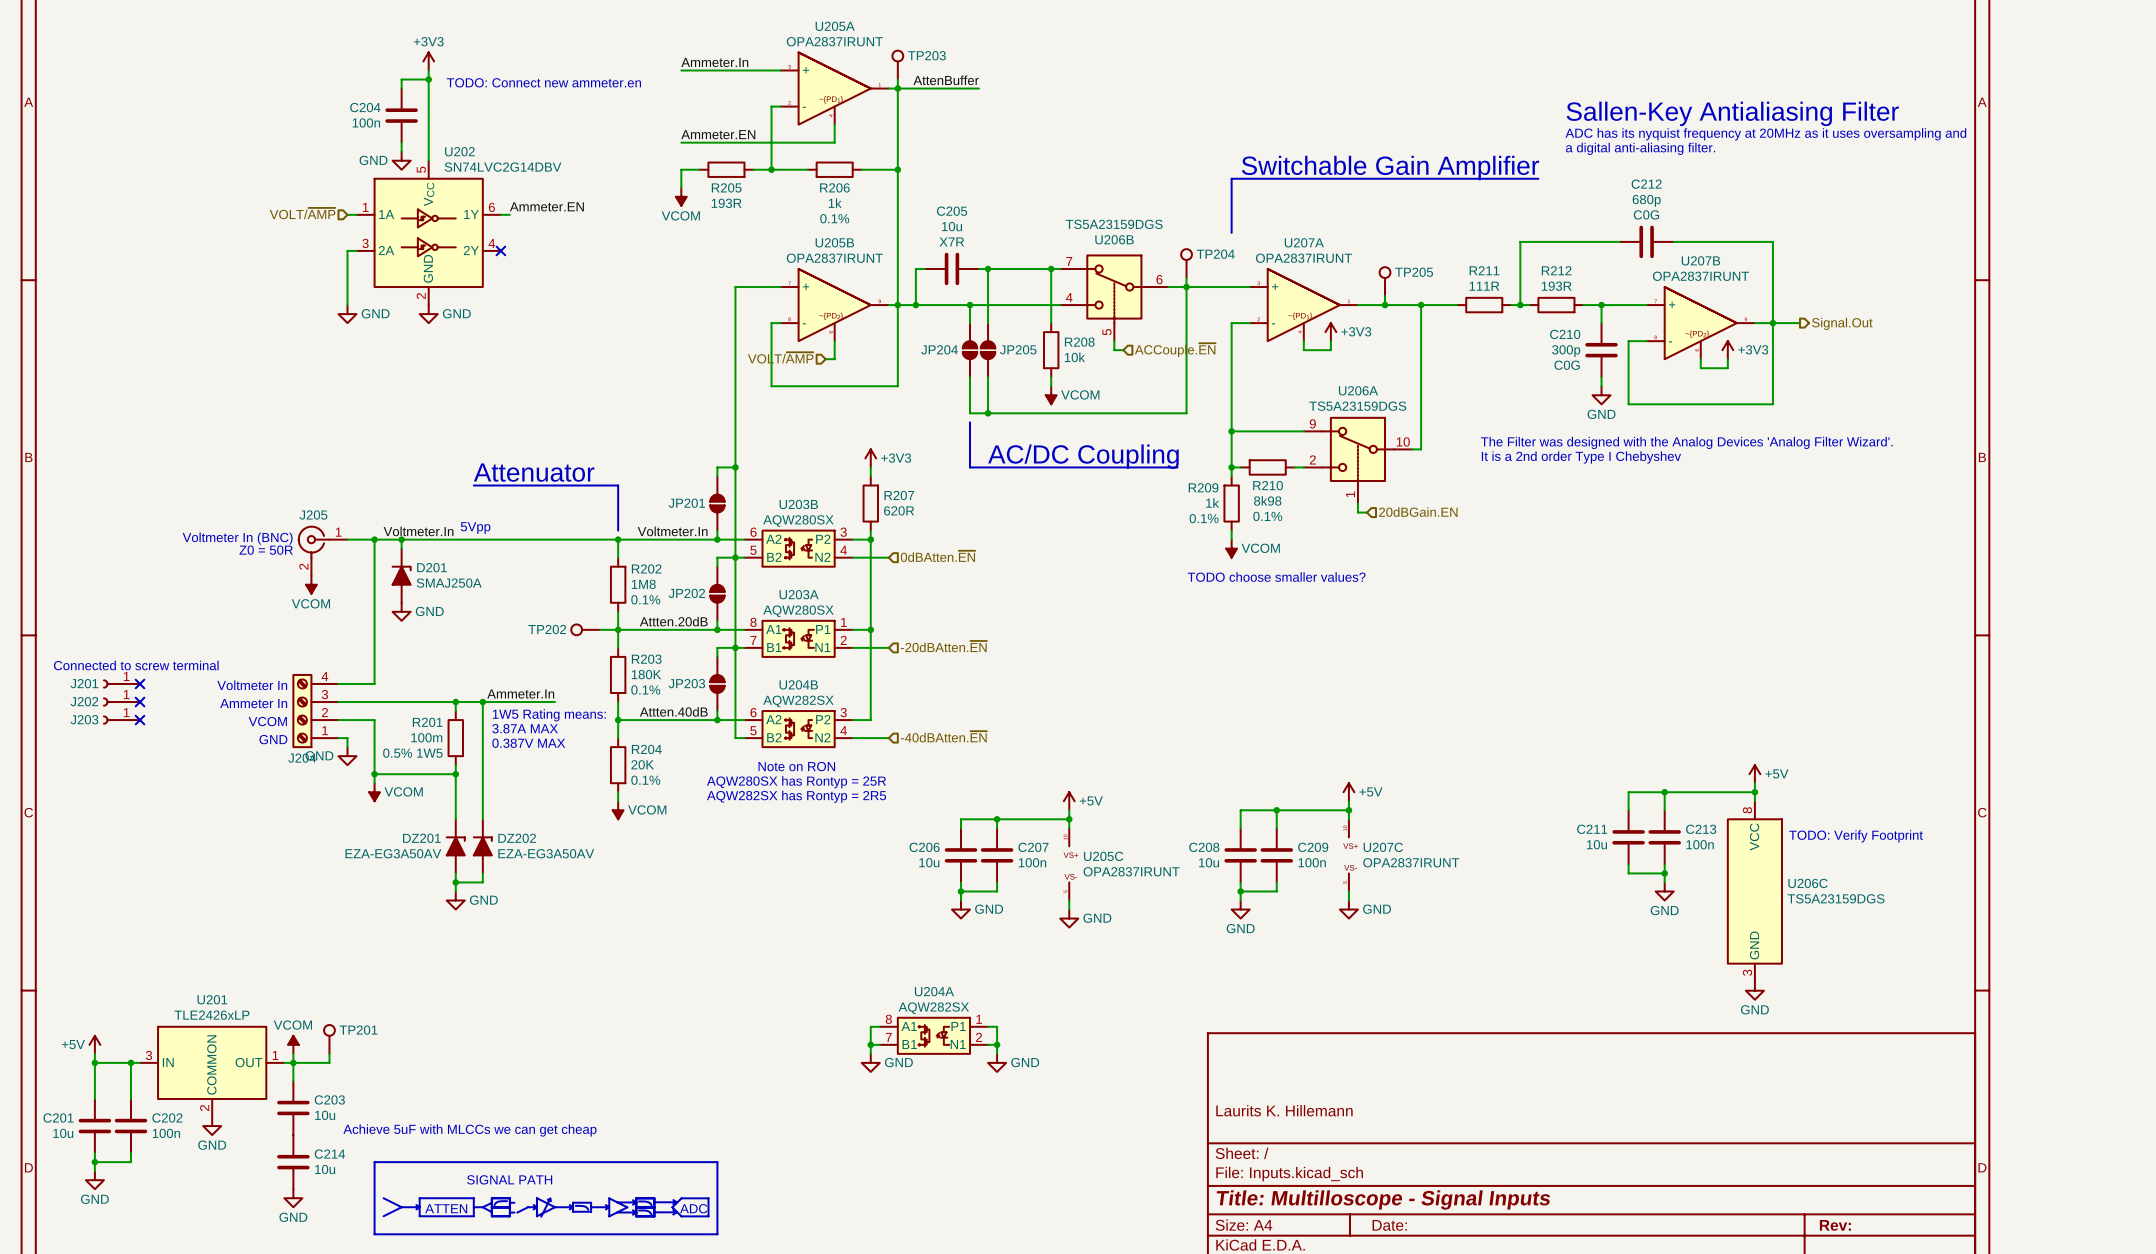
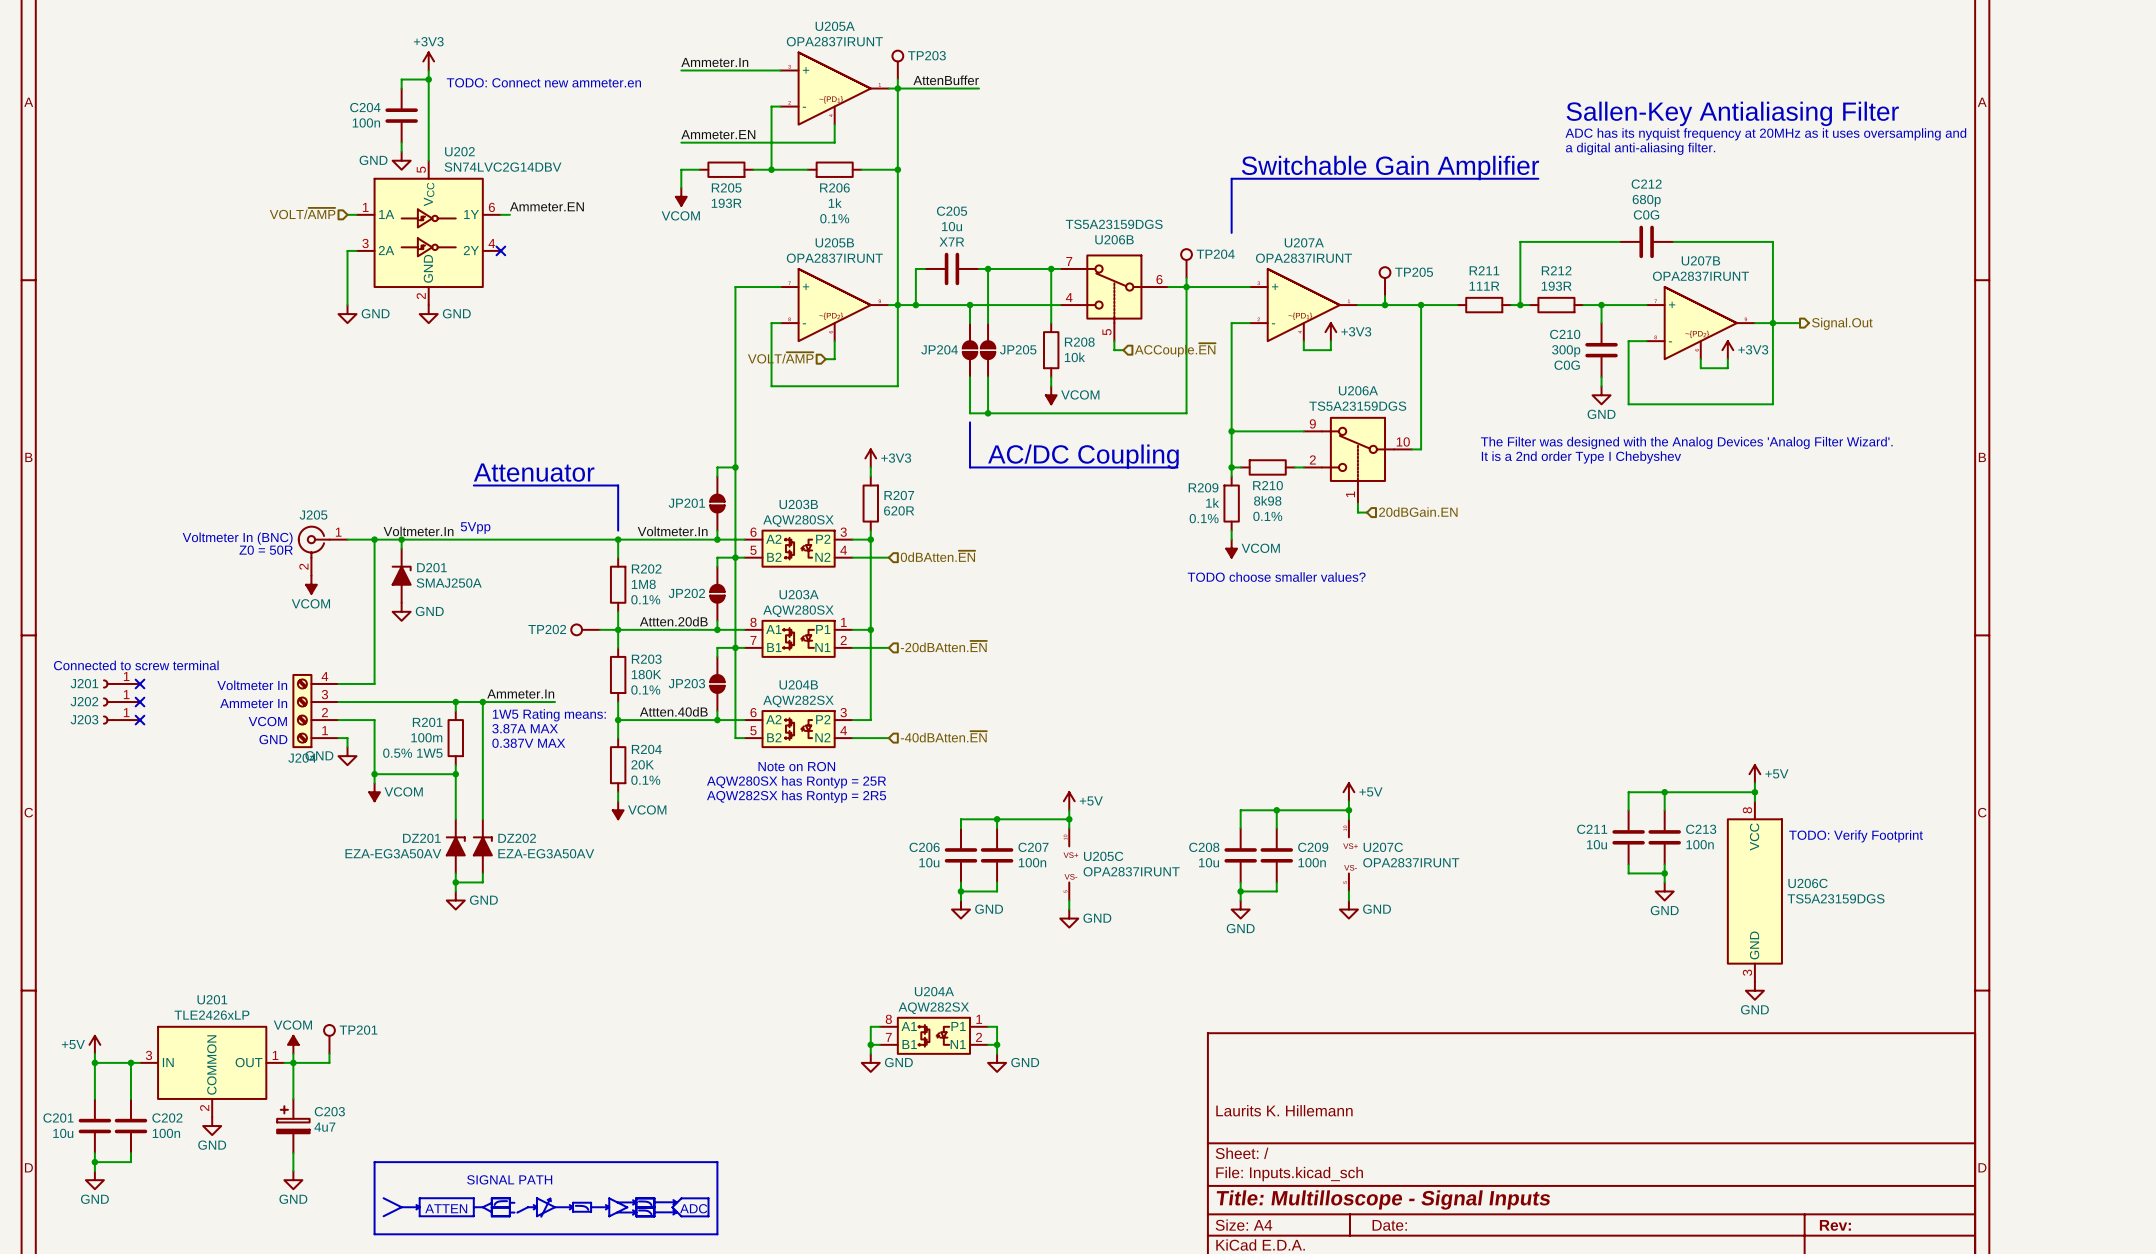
C203 symbol: [277, 1080, 310, 1136] -> [277, 1098, 310, 1154]
C203 value: 10u (325, 1115) -> 4u7 (324, 1127)
text: Achieve 5uF with MLCCs we can get cheap (469, 1130) -> none
C214: 10u (293, 1162) -> none
power symbol position: GND (293, 1198) -> GND (293, 1180)

